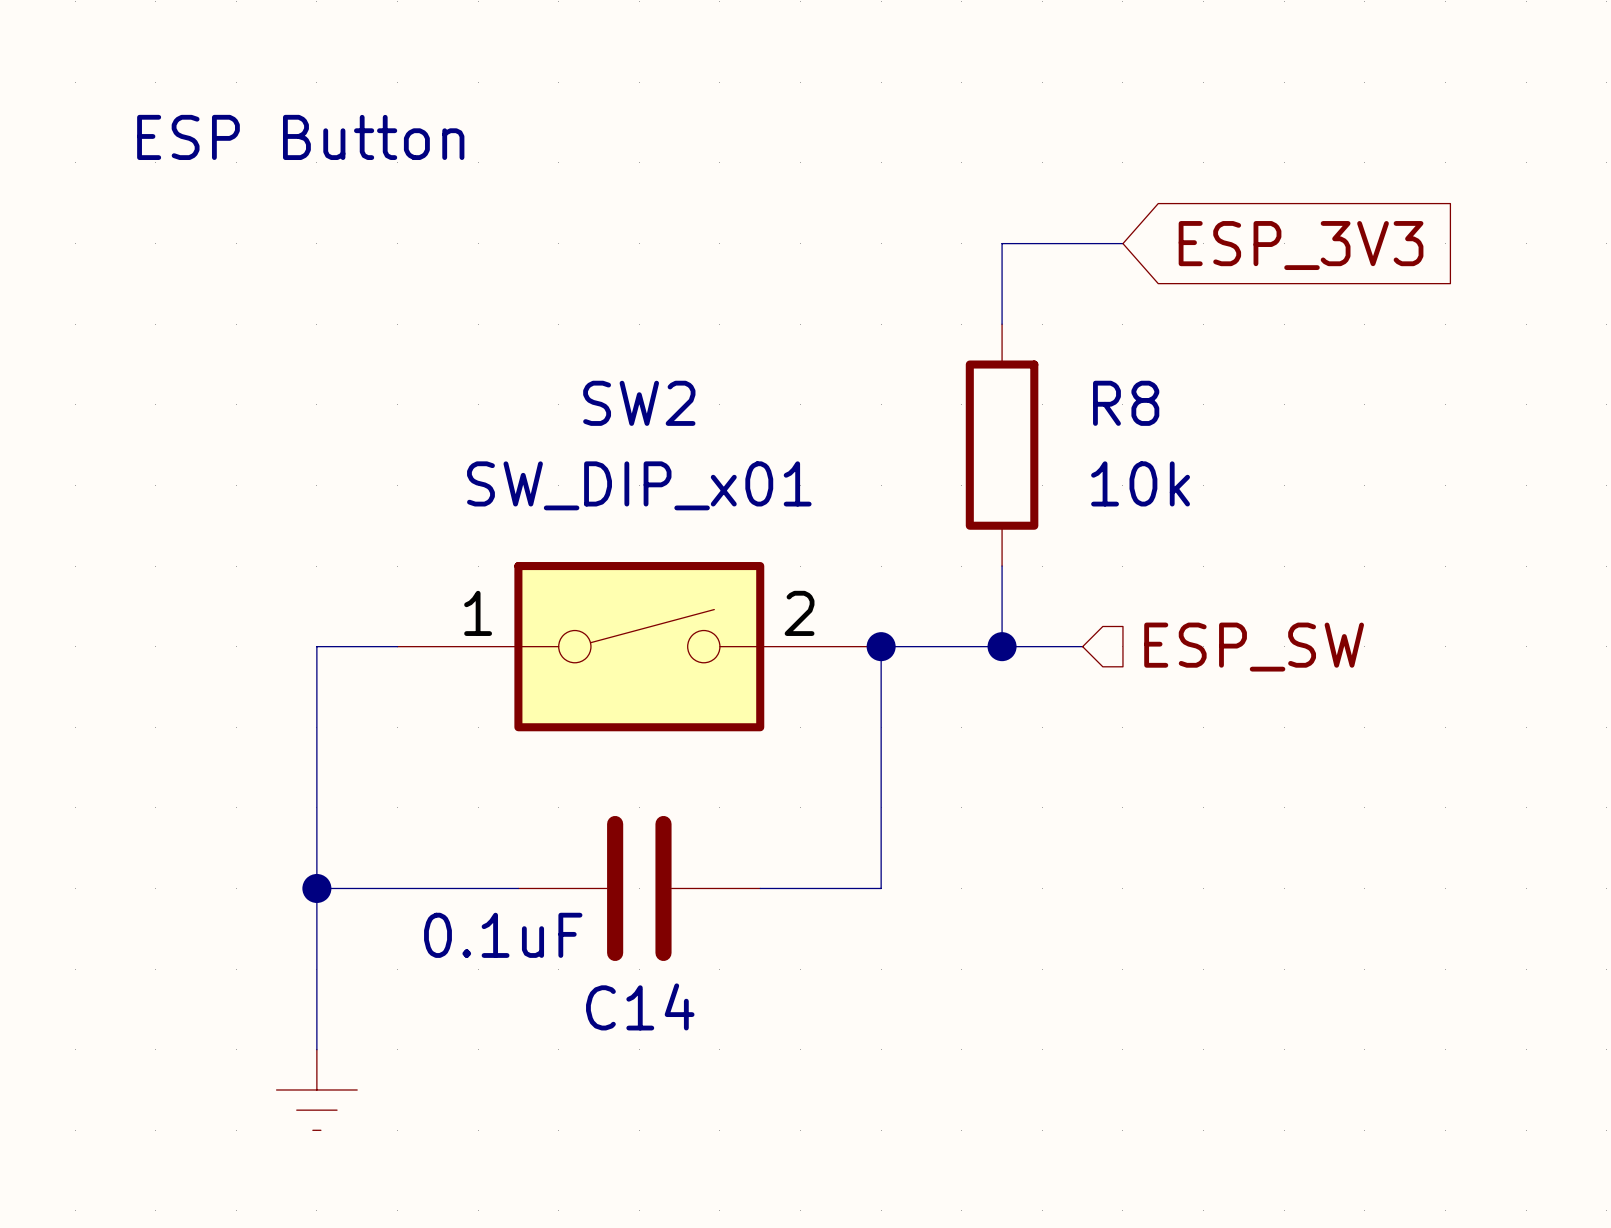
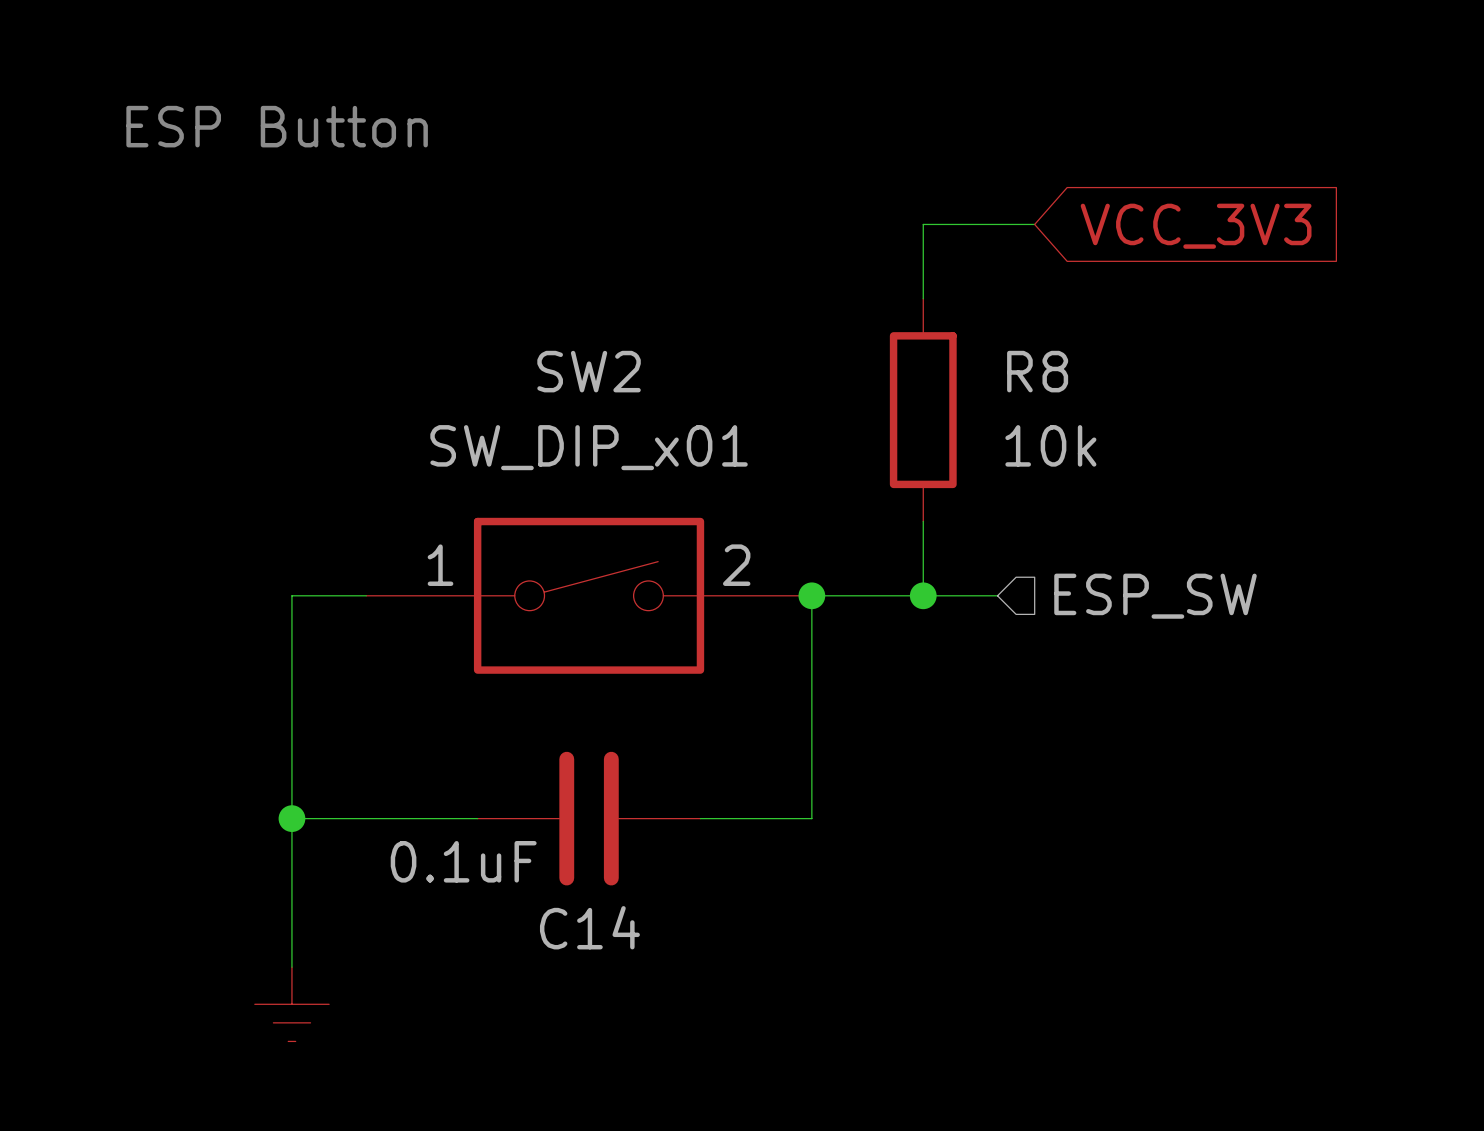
global label: ESP_3V3 (1301, 245) -> VCC_3V3 (1196, 226)

